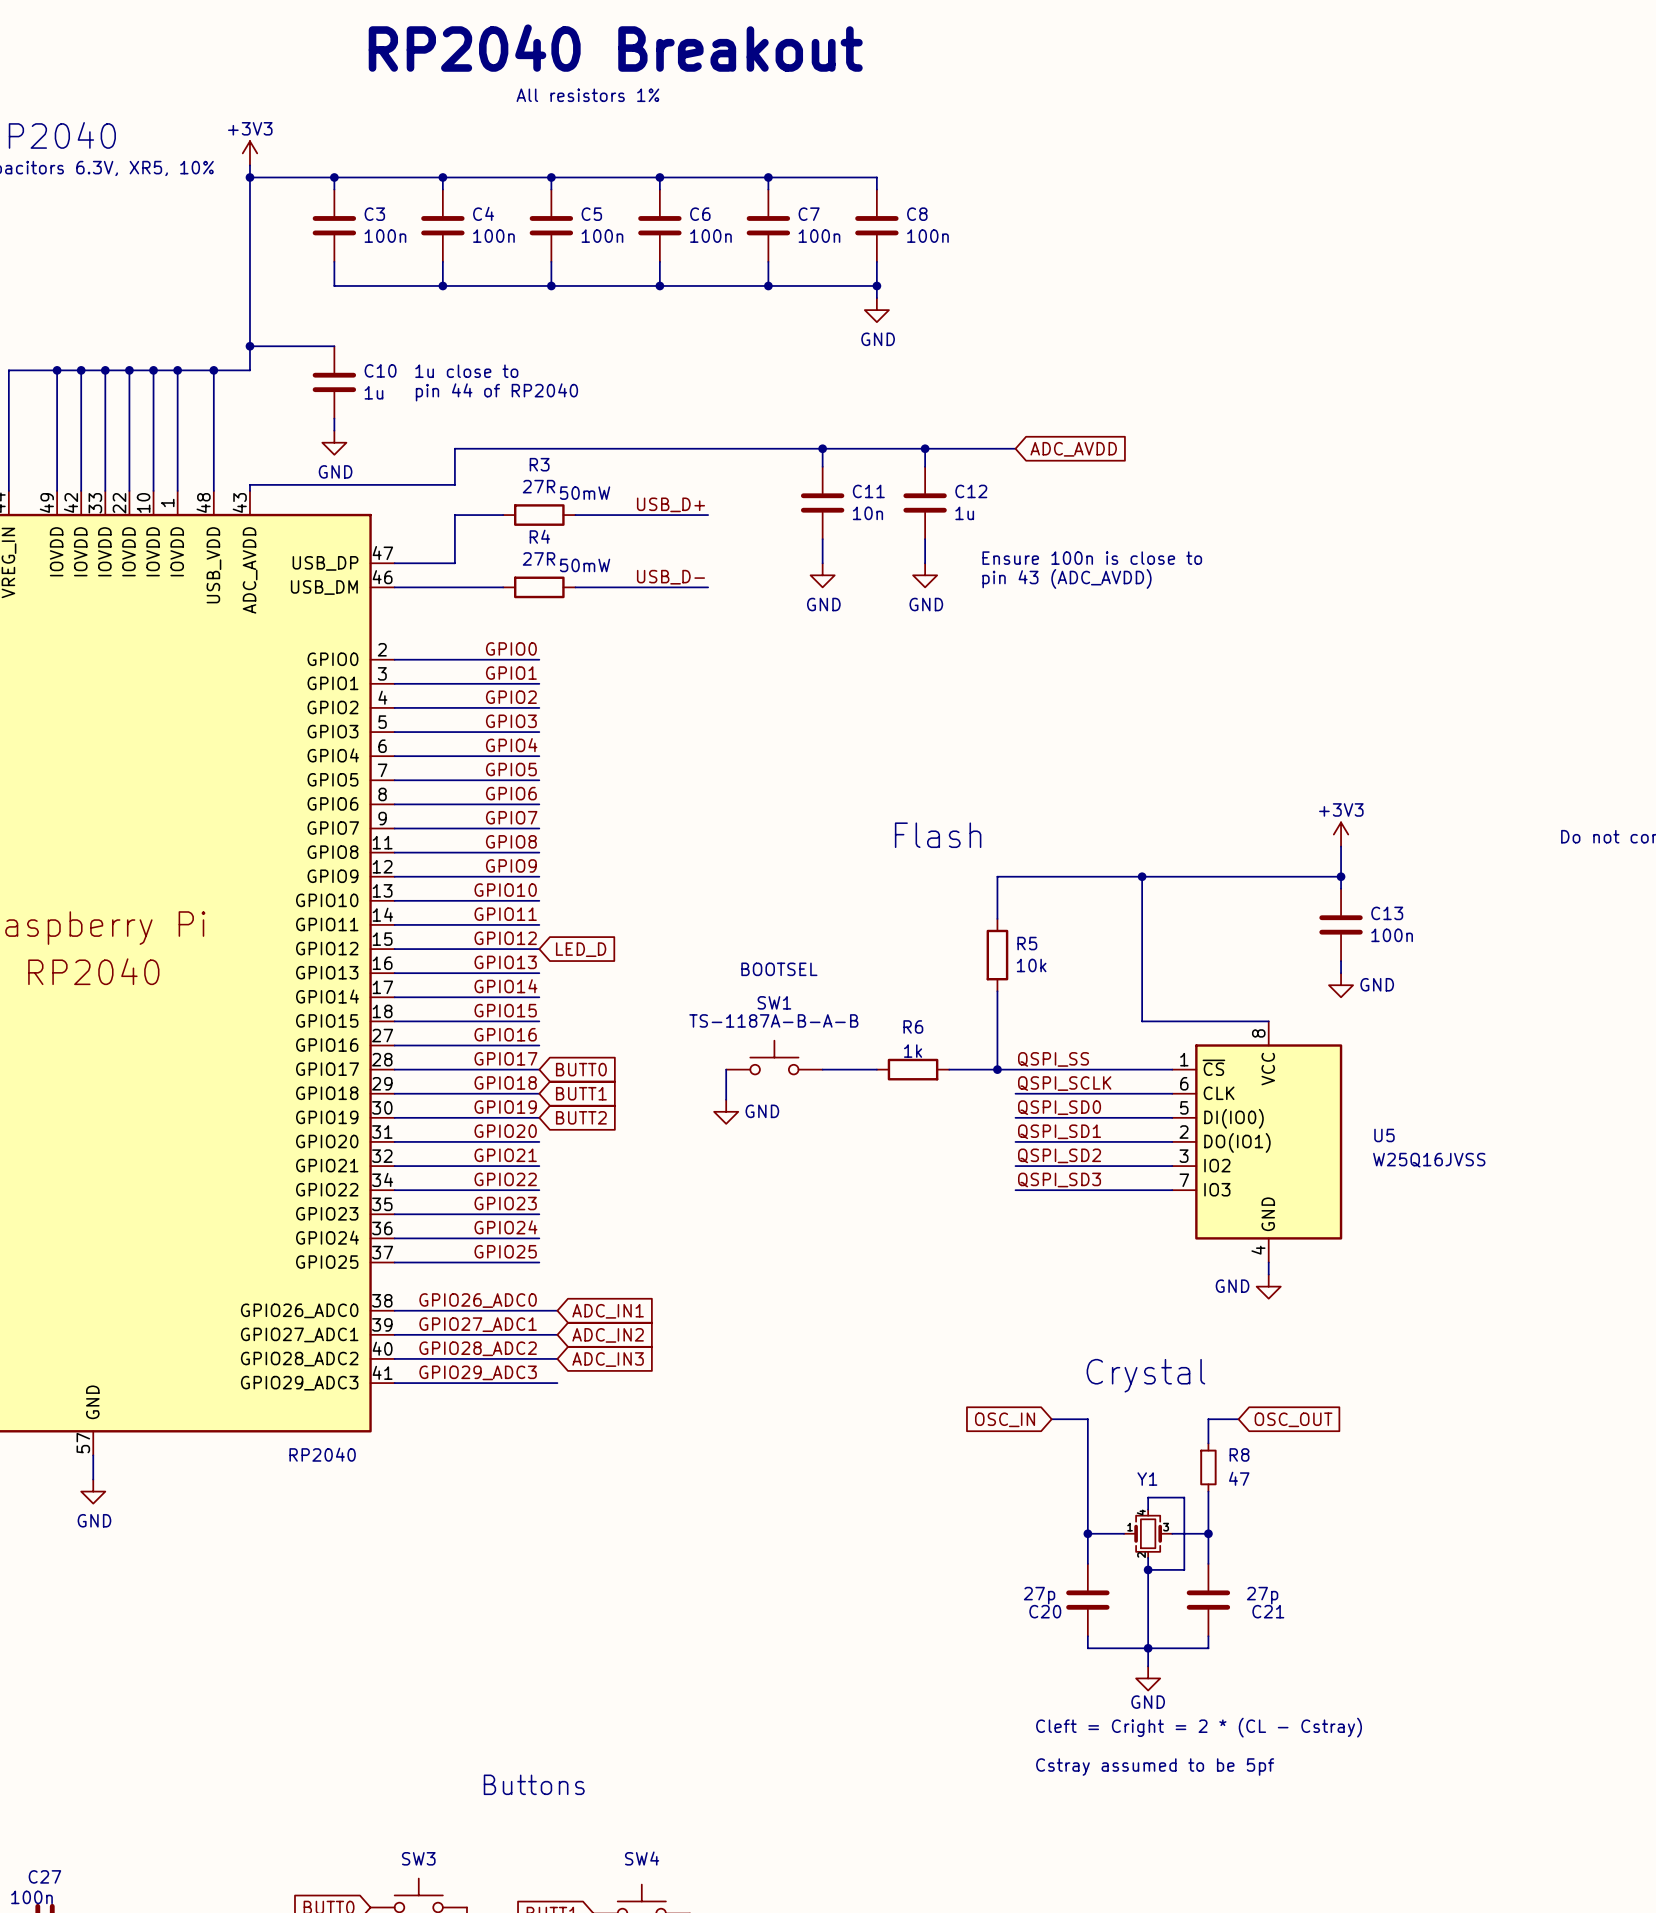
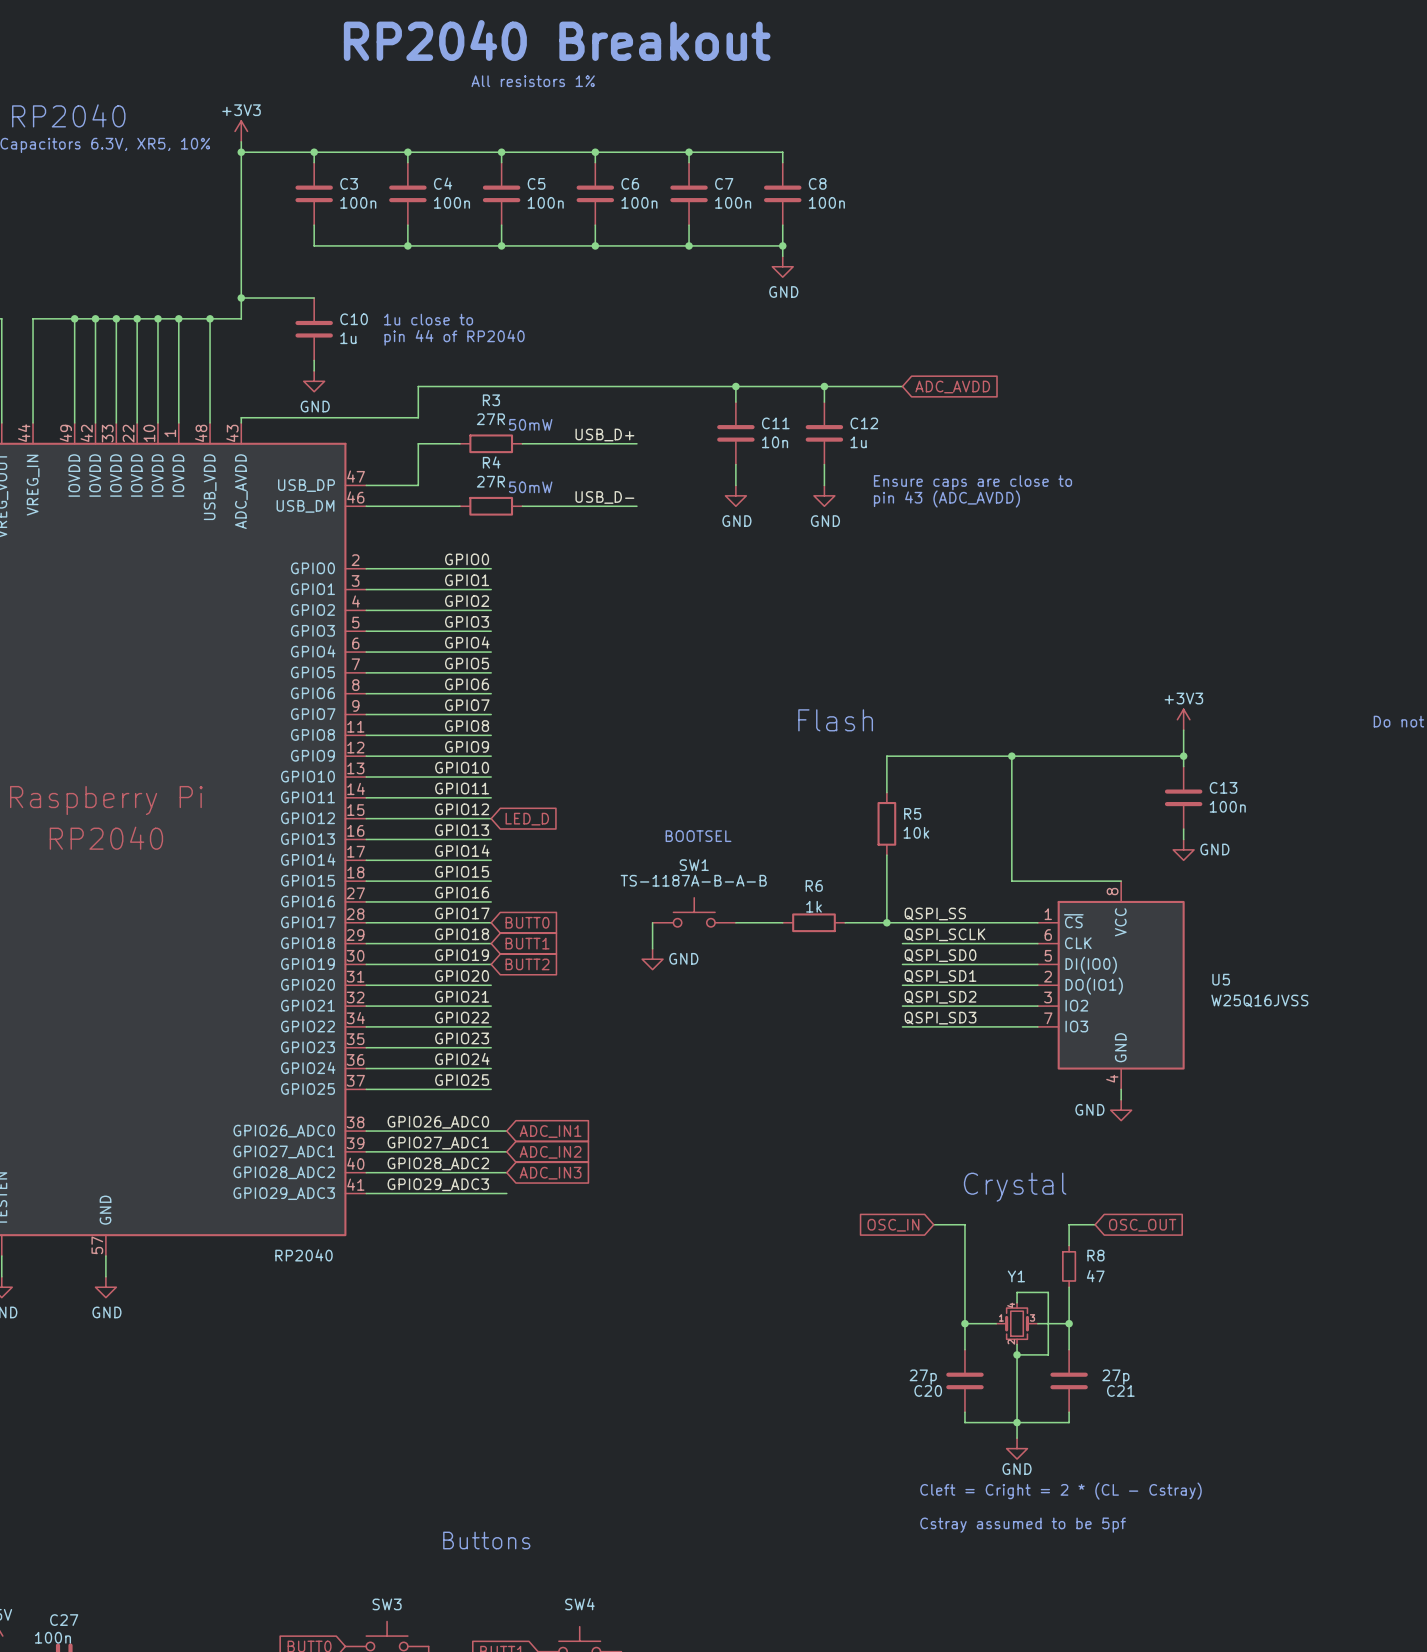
text: Ensure 100n is close to (1092, 558) -> Ensure caps are close to (972, 482)

